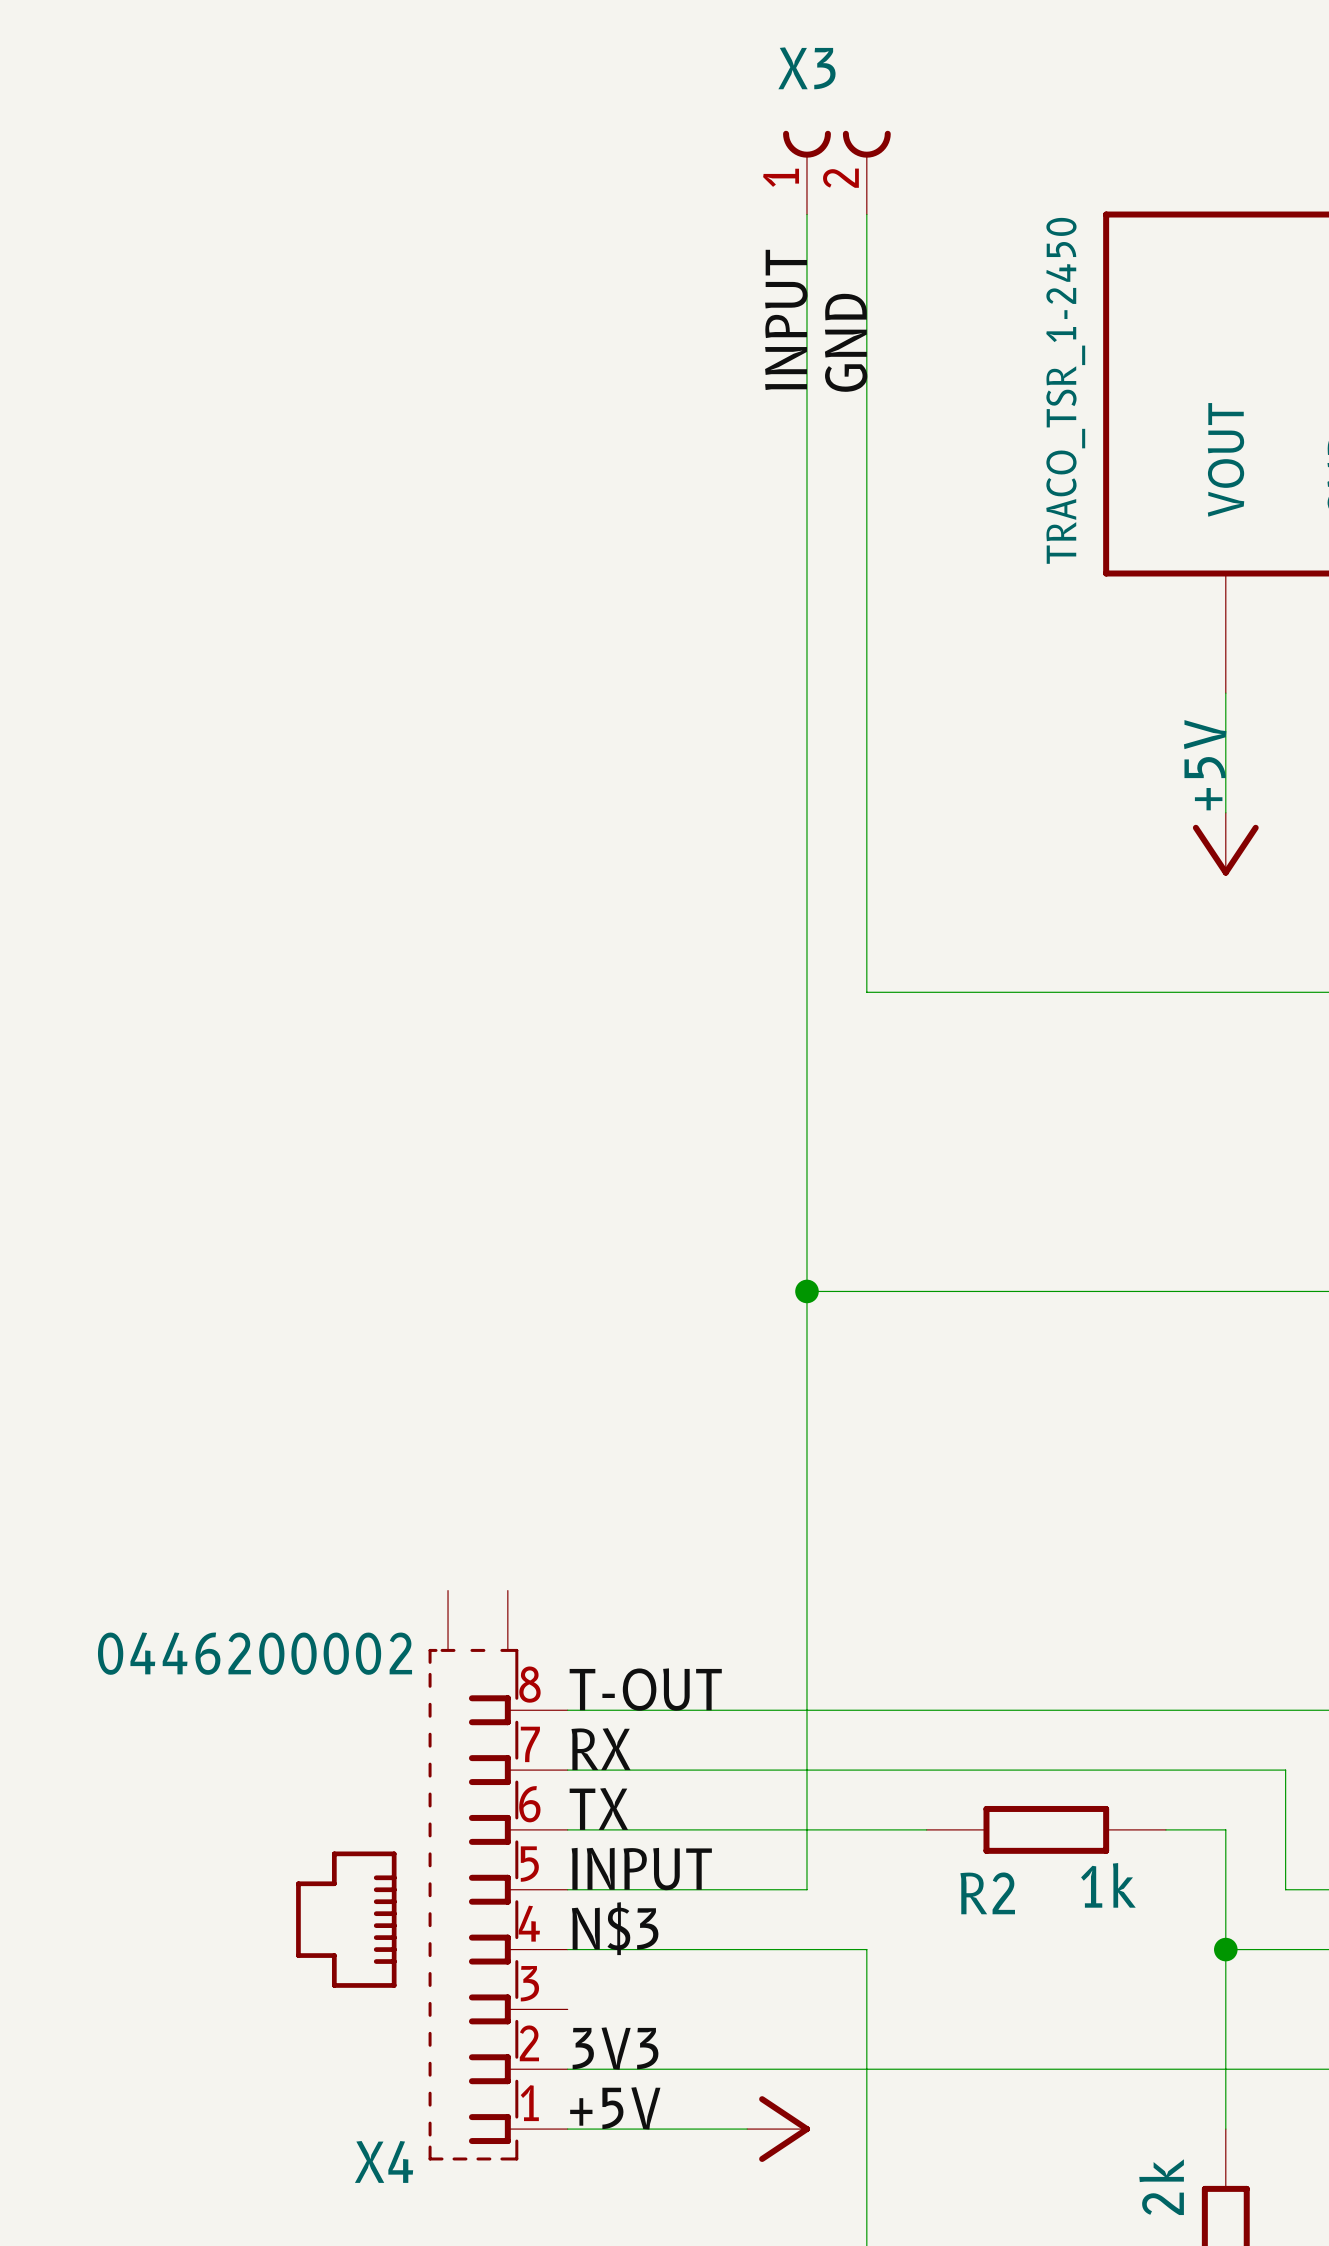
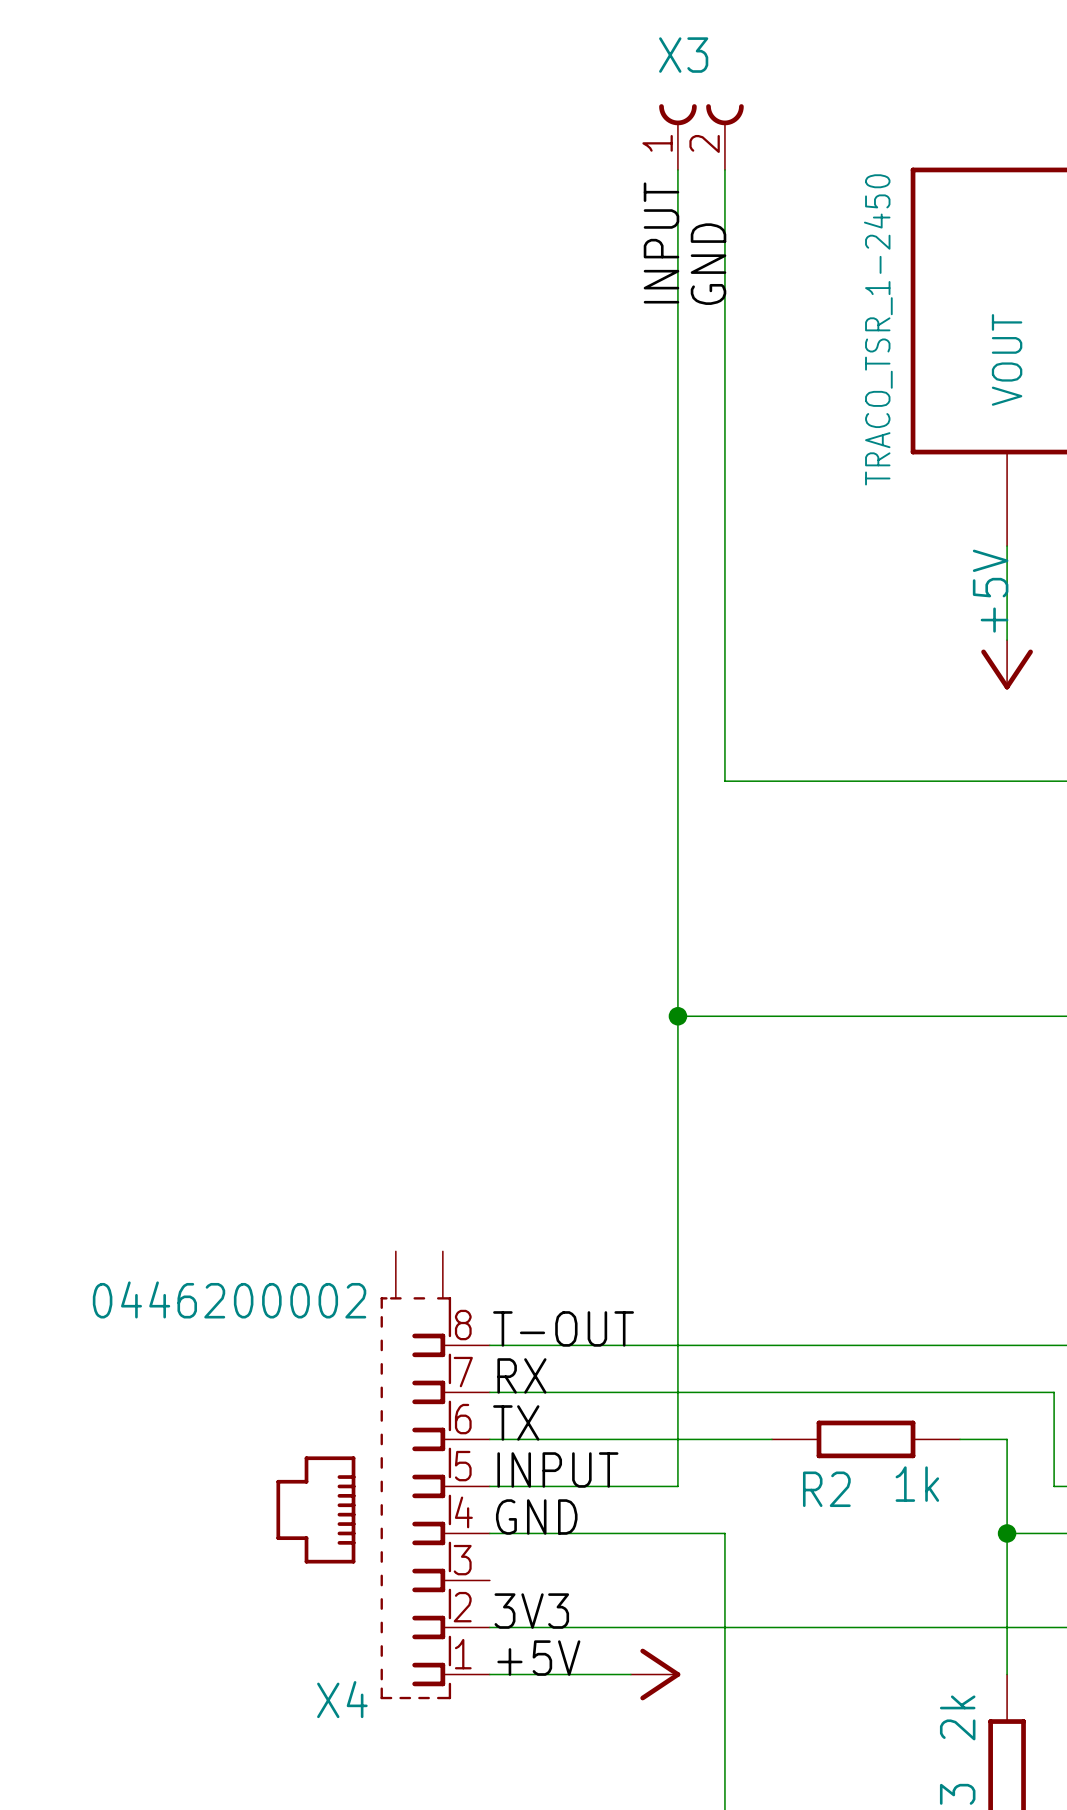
label: N$3 (615, 1928) -> GND (536, 1517)

